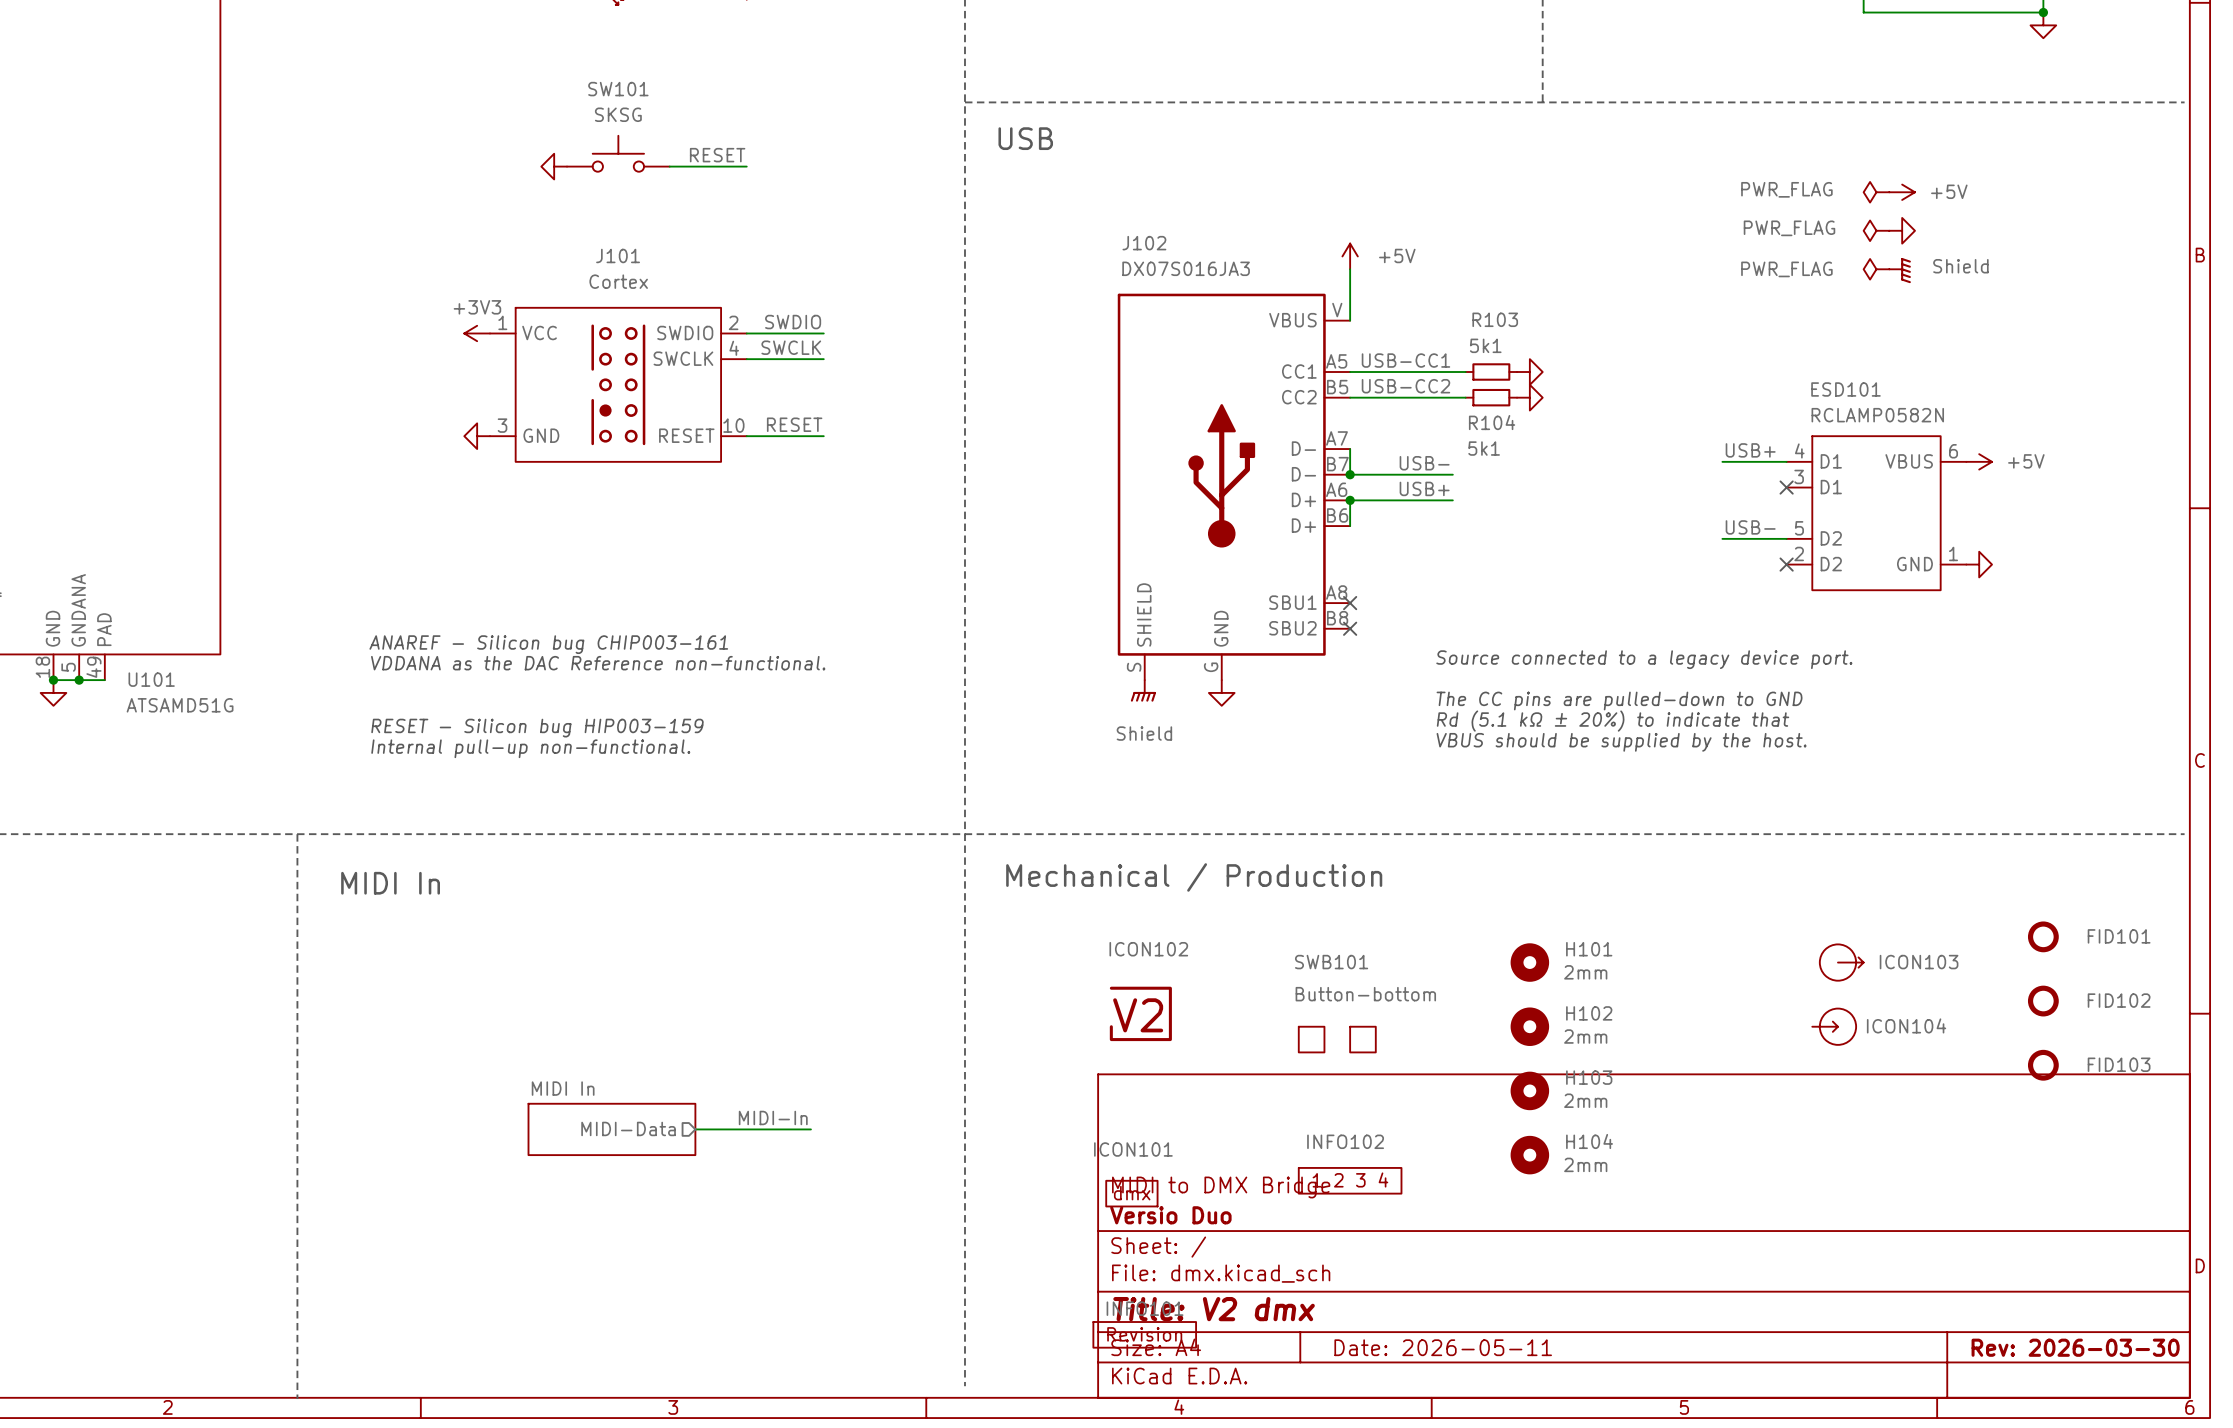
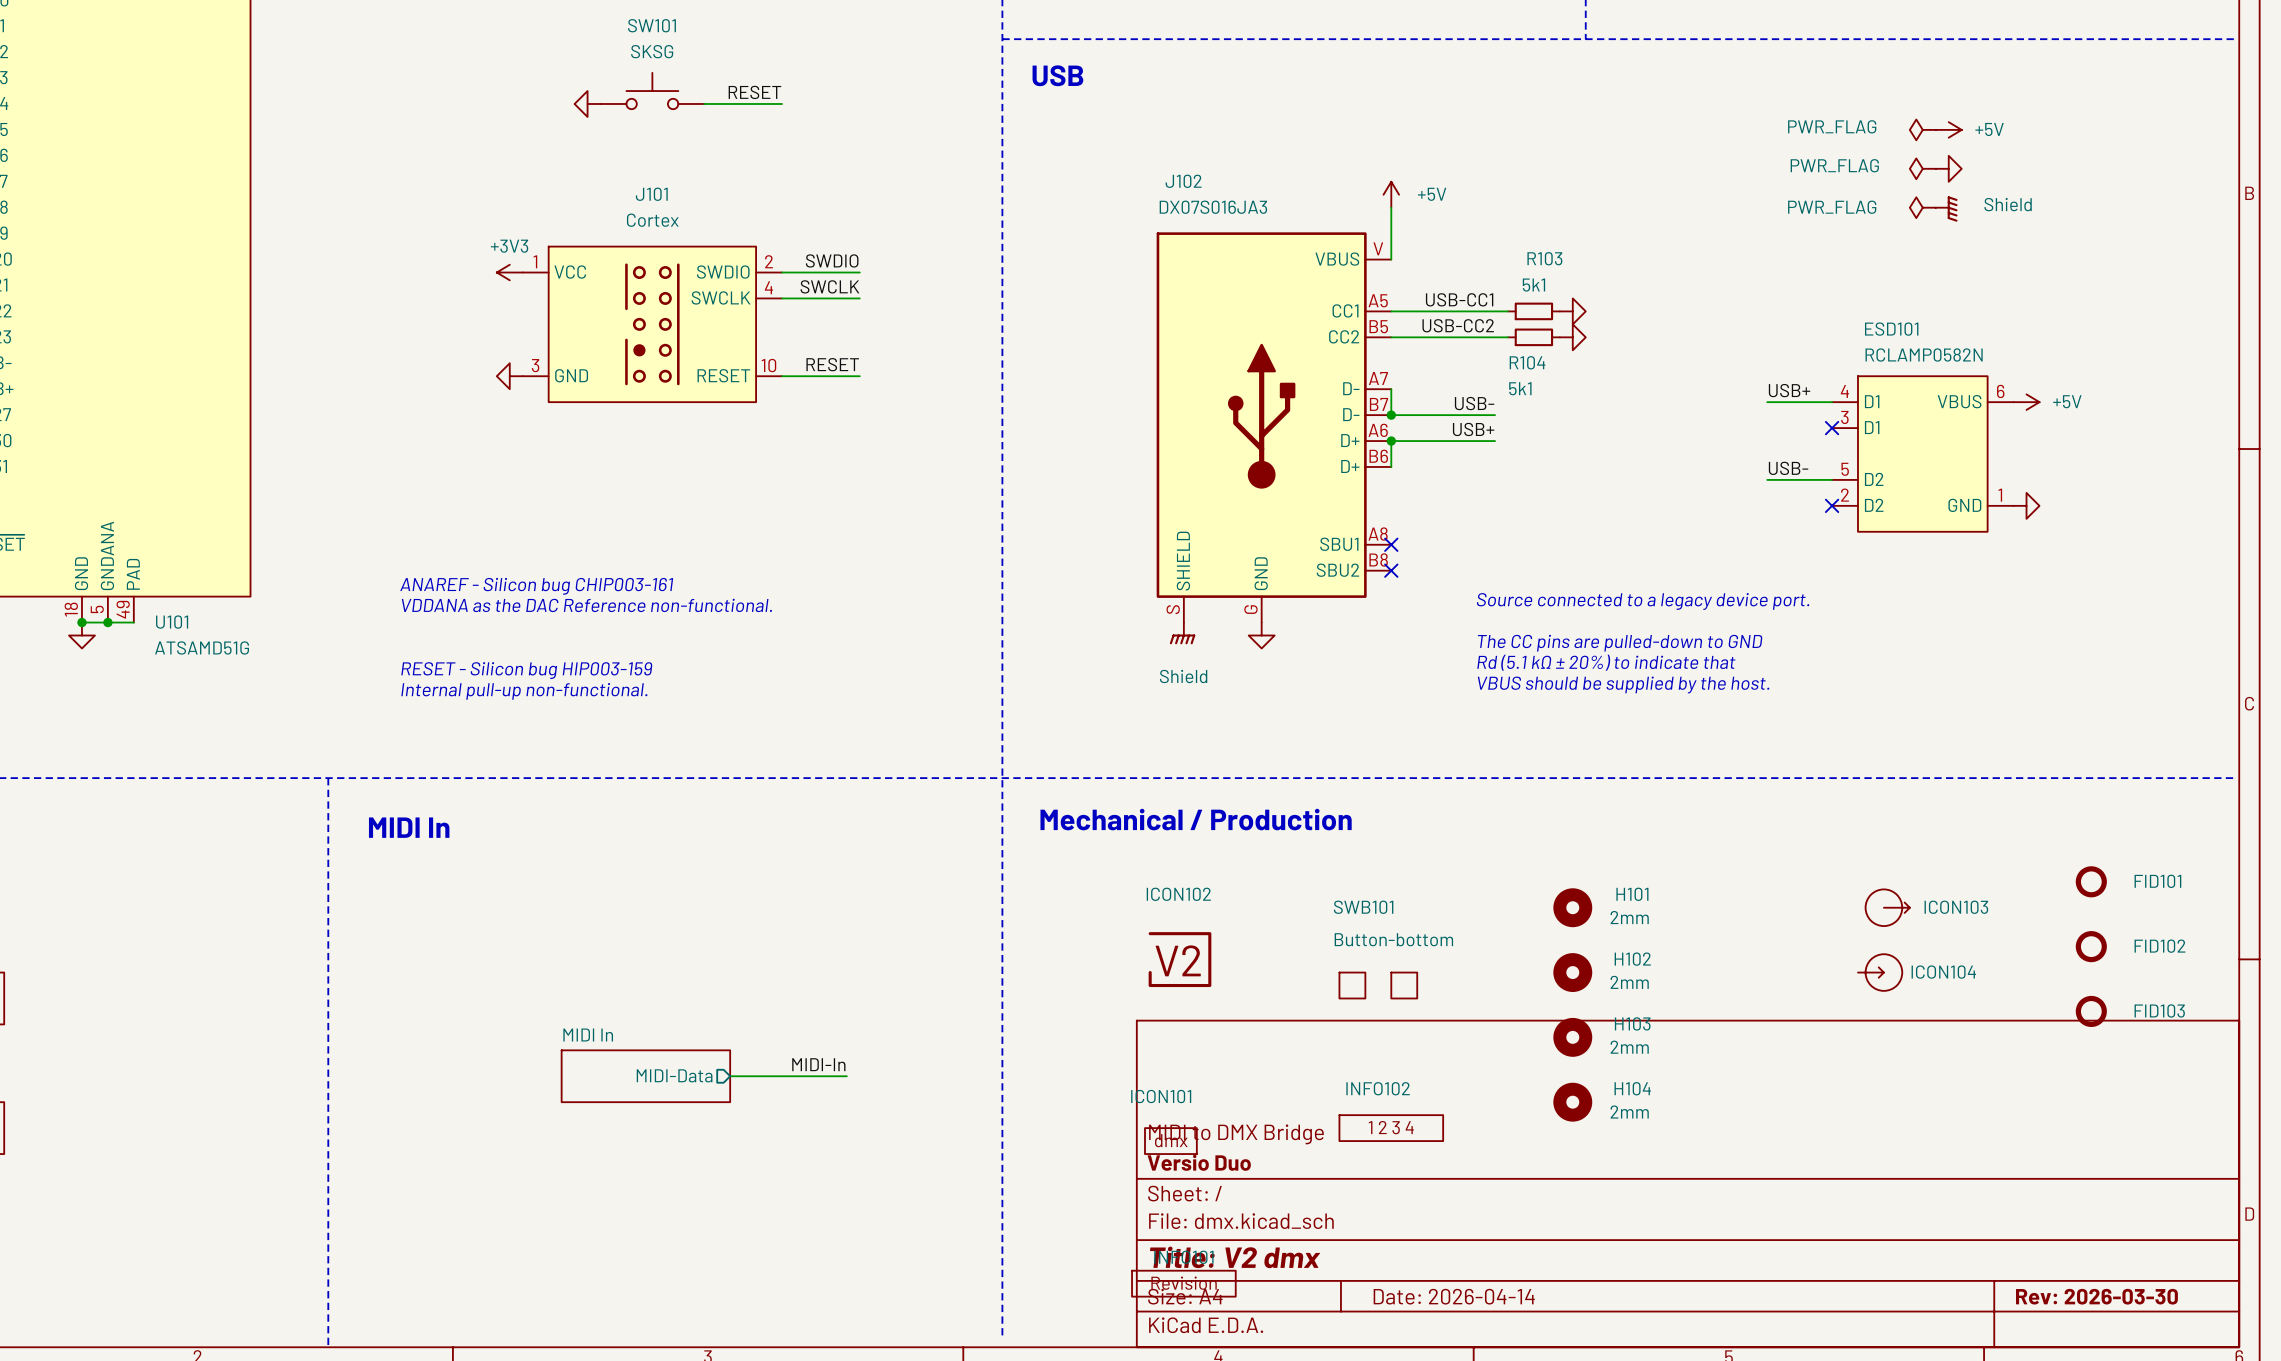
title block: Date: 2026-05-11 (1443, 1347) -> Date: 2026-04-14 (1454, 1296)

